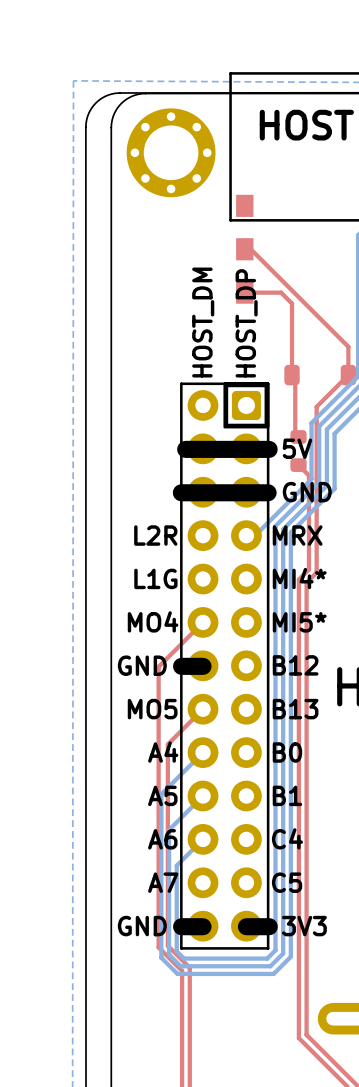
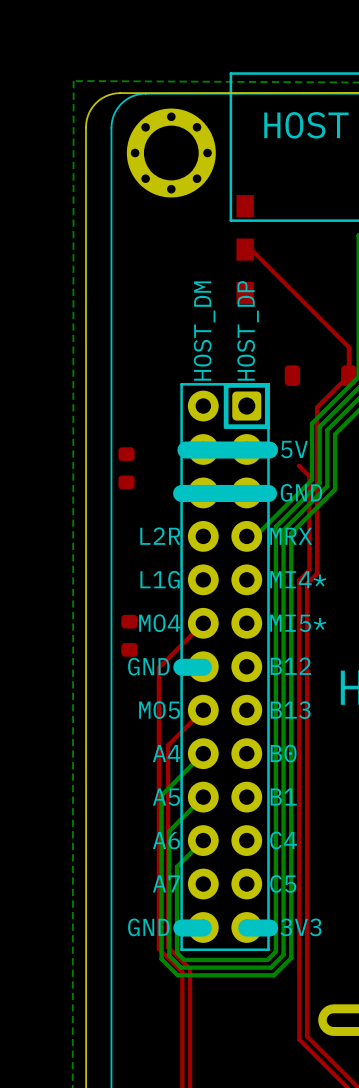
top track: (244, 292) (281, 292) (292, 303) (292, 375) (295, 378) (295, 440) -> none
part: (298, 451) -> none
part: none -> (126, 468)
part: none -> (129, 635)

